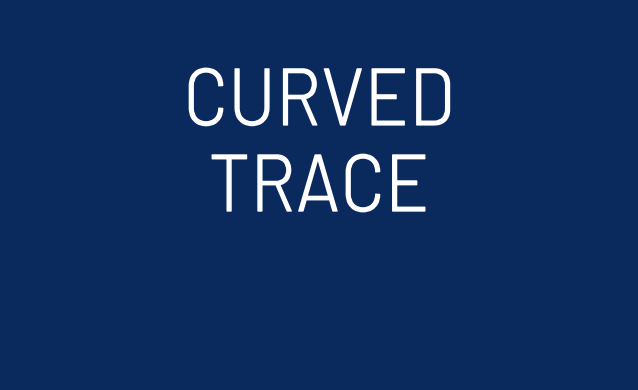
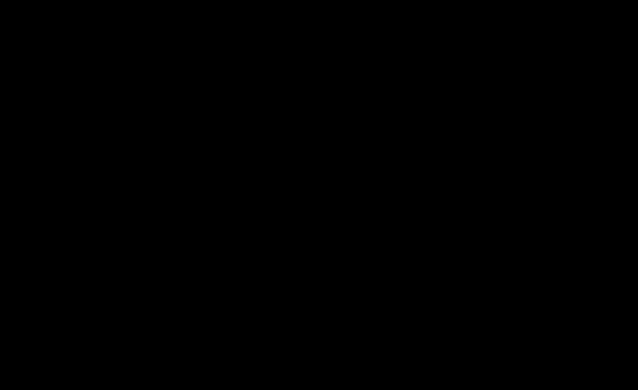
text: CURVED (319, 96) -> none
text: TRACE (318, 183) -> none

